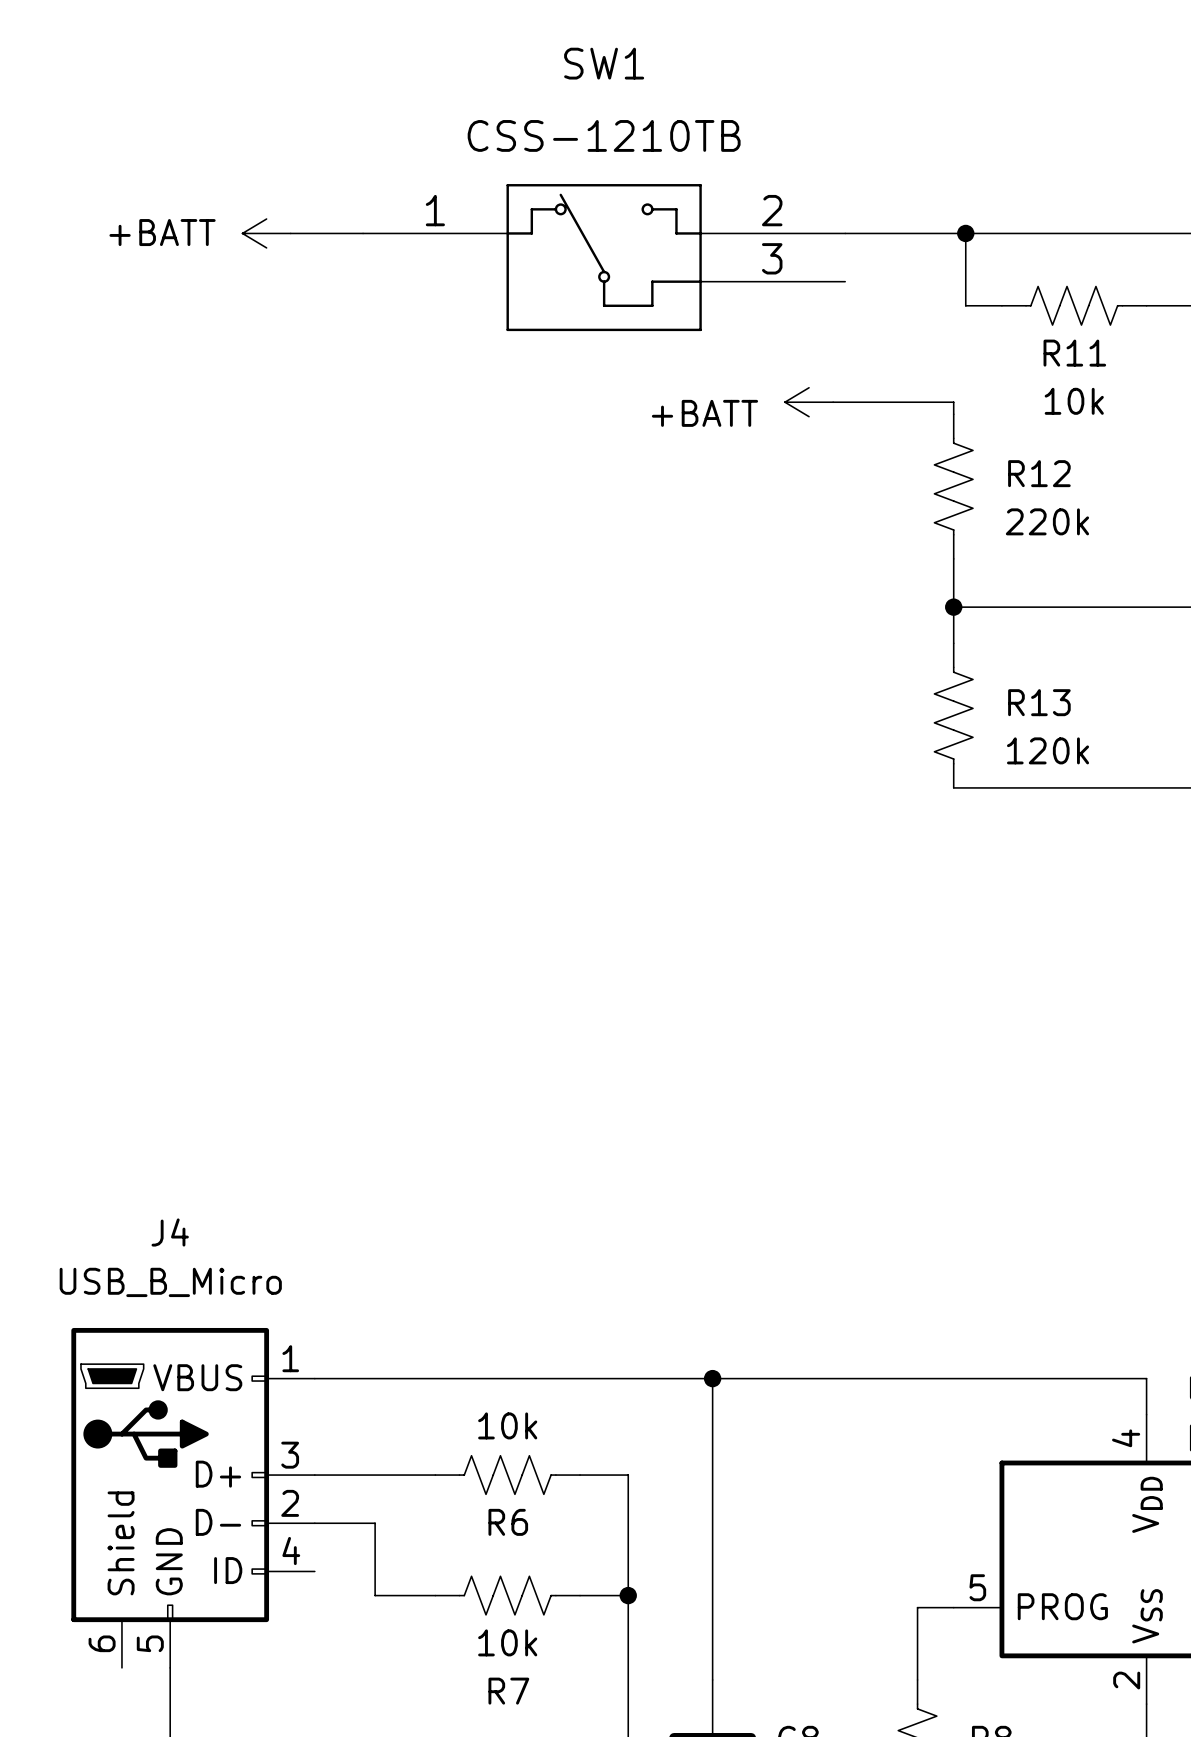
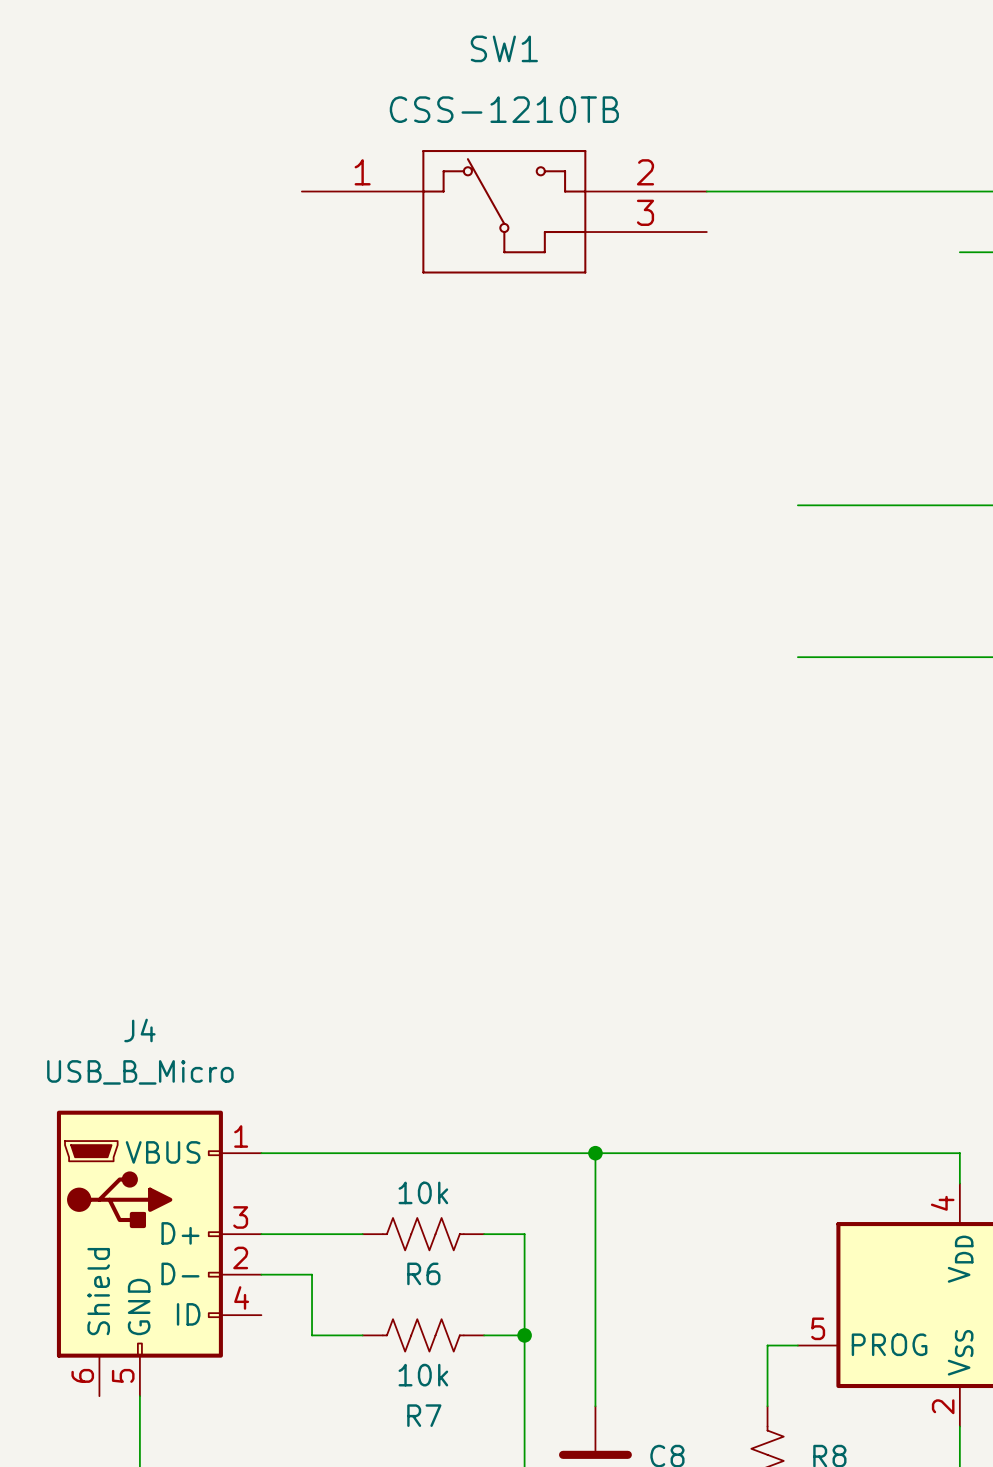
power symbol: +BATT (266, 233) -> none
wire: (290, 233) (363, 233) -> none
wire: (965, 233) (965, 305) (1001, 305) -> none
junction: (965, 233) -> none
R11: 10k (1074, 305) -> none
power symbol: +BATT (809, 402) -> none
wire: (833, 402) (953, 402) (953, 414) -> none
R12: 220k (953, 486) -> none
wire: (953, 558) (953, 643) -> none
junction: (953, 607) -> none
R13: 120k (953, 715) -> none

